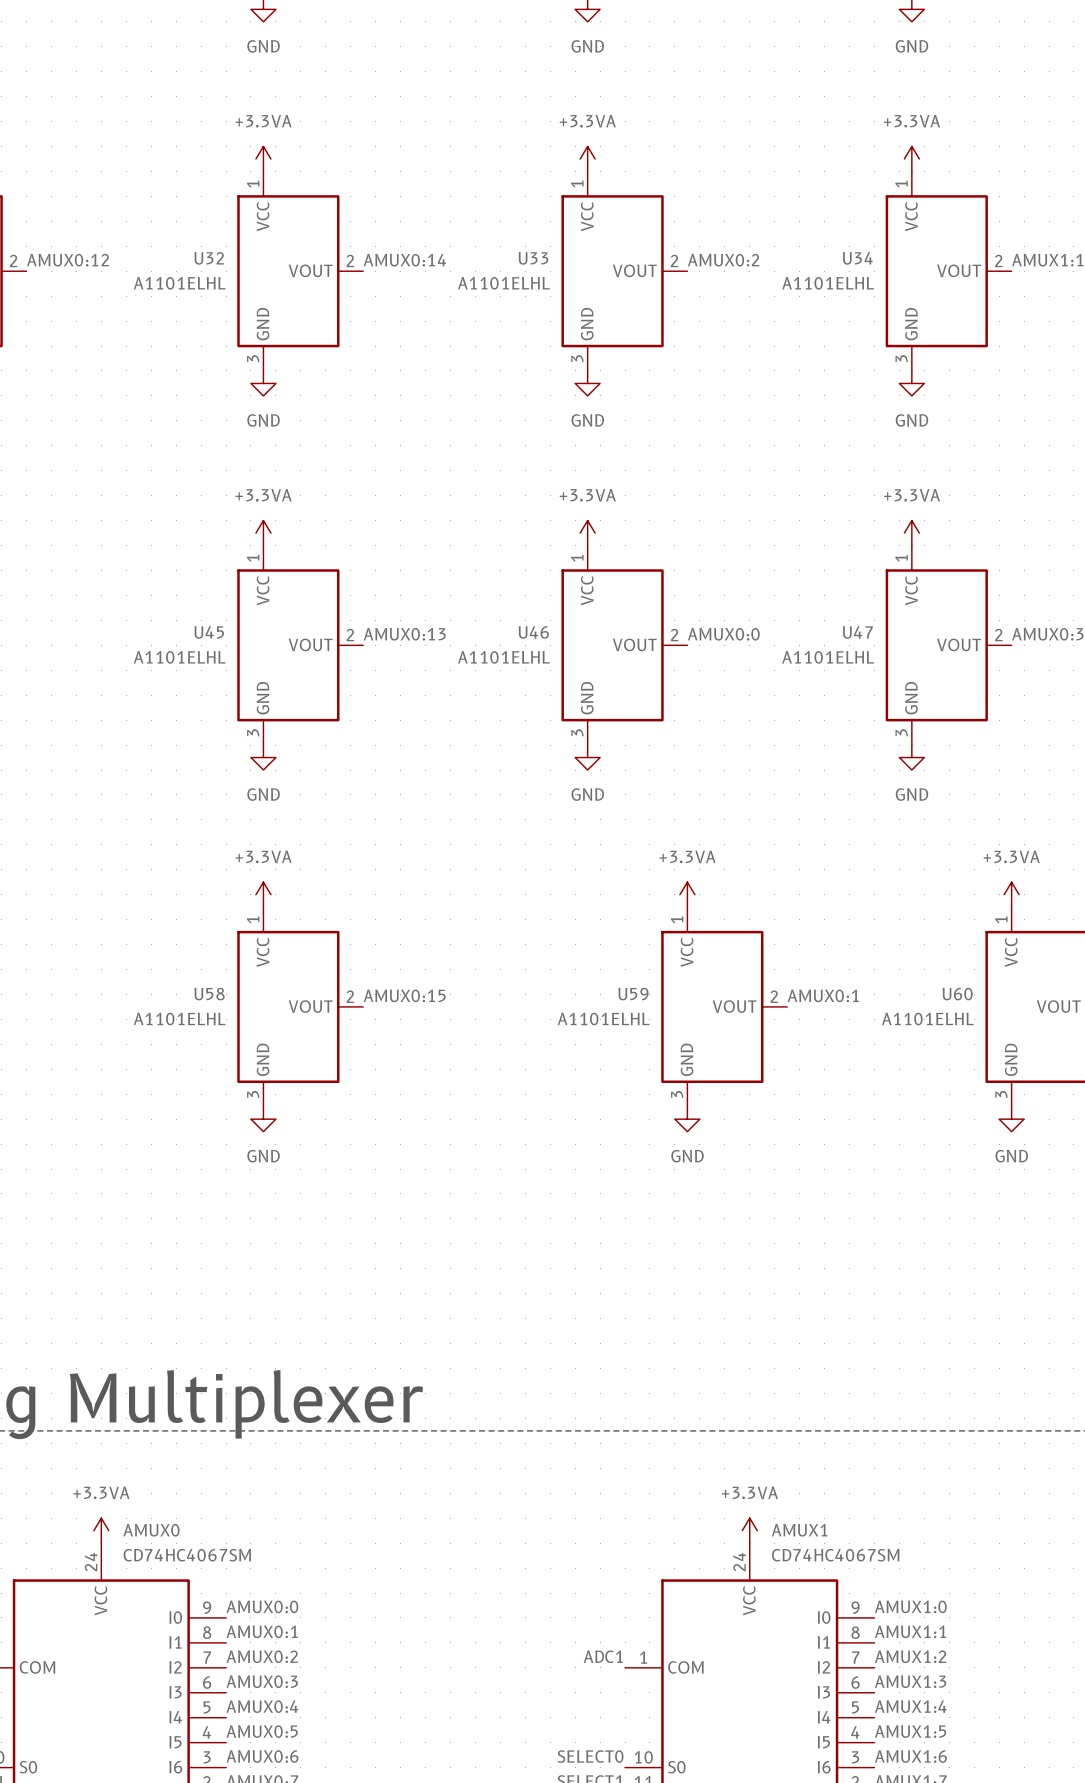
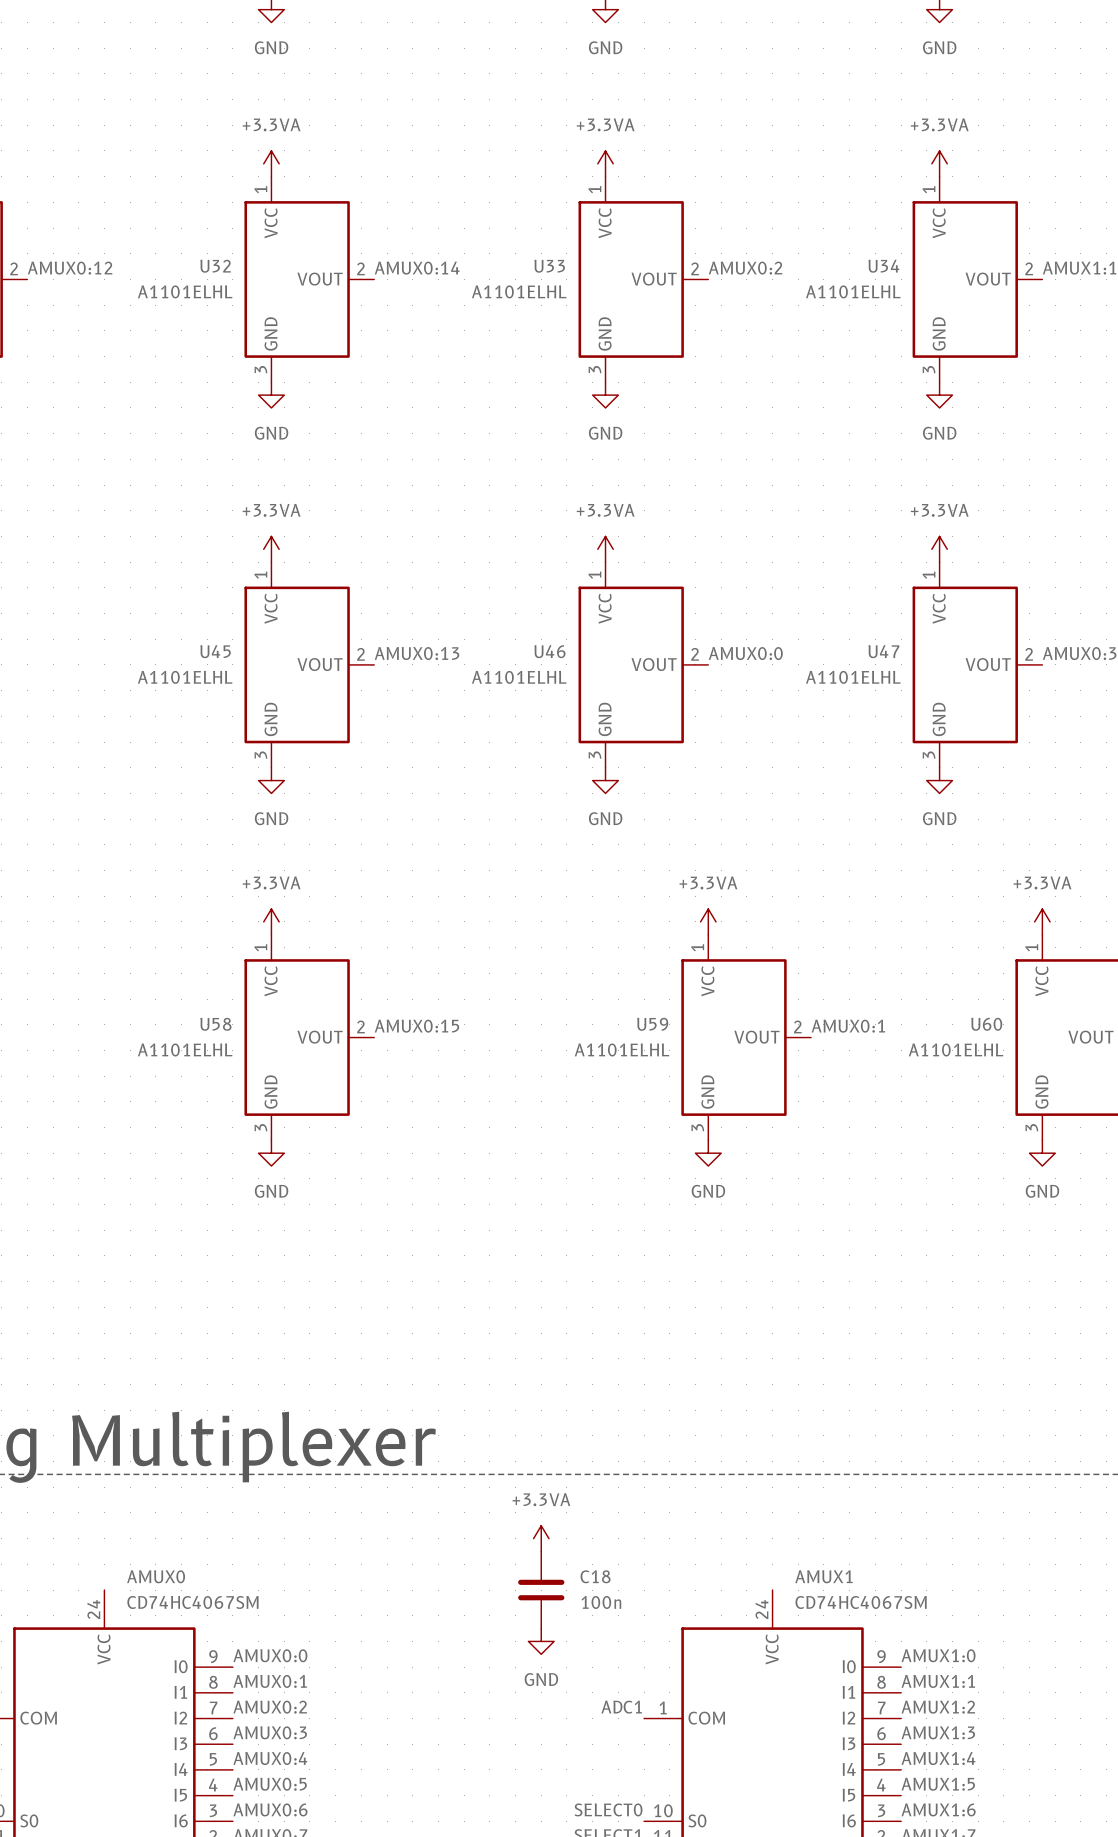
power symbol: none -> +3.3VA (541, 1538)
power symbol: +3.3VA (101, 1530) -> none
power symbol: +3.3VA (749, 1530) -> none
C18: none -> 100n (541, 1590)
power symbol: none -> GND (541, 1641)

